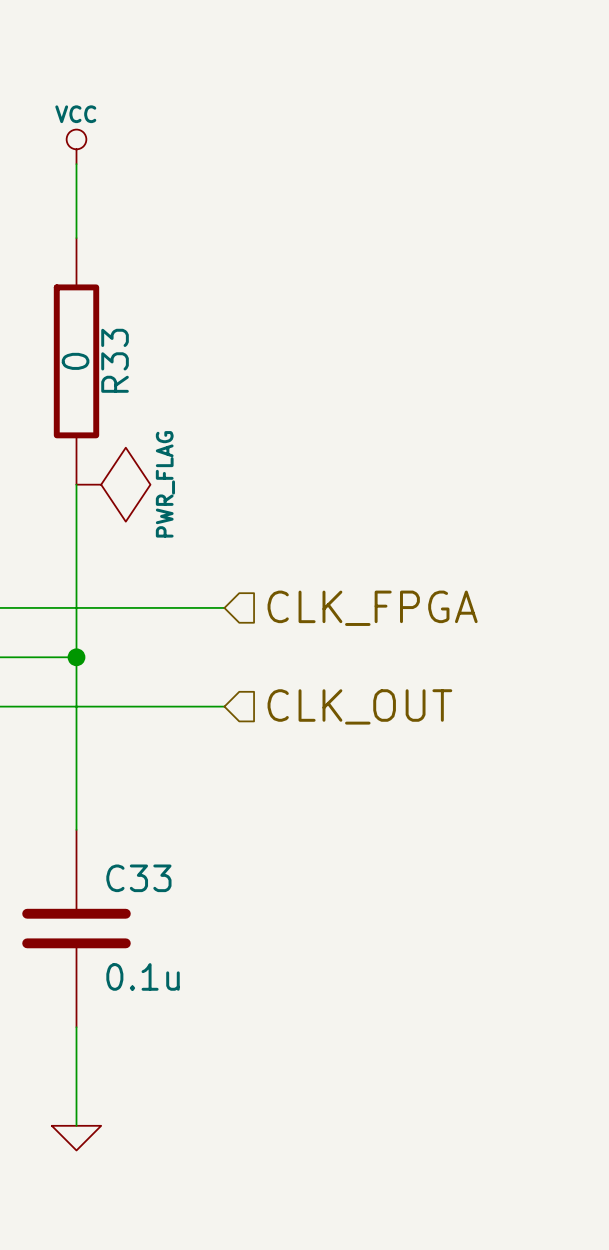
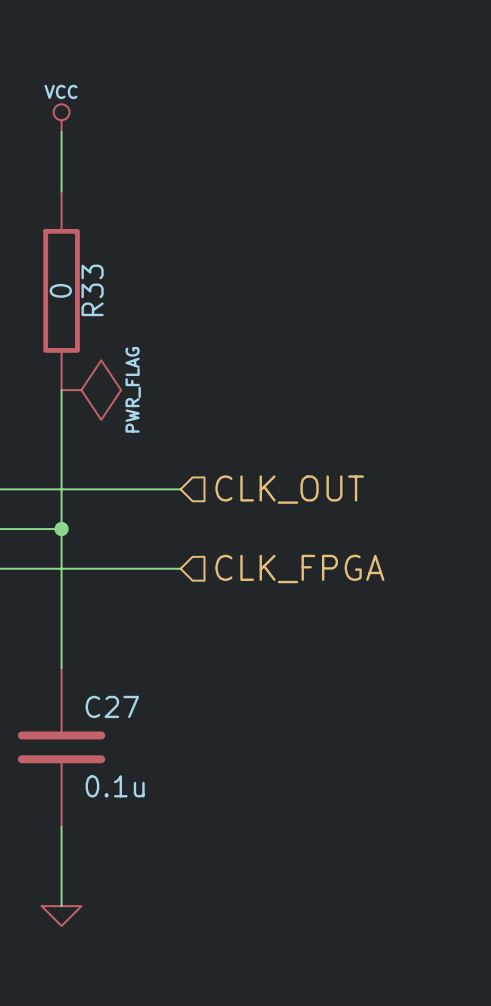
hierarchical label: CLK_FPGA (372, 608) -> CLK_OUT (289, 489)
hierarchical label: CLK_OUT (359, 706) -> CLK_FPGA (299, 568)
C33 name: C33 (138, 878) -> C27 (112, 706)

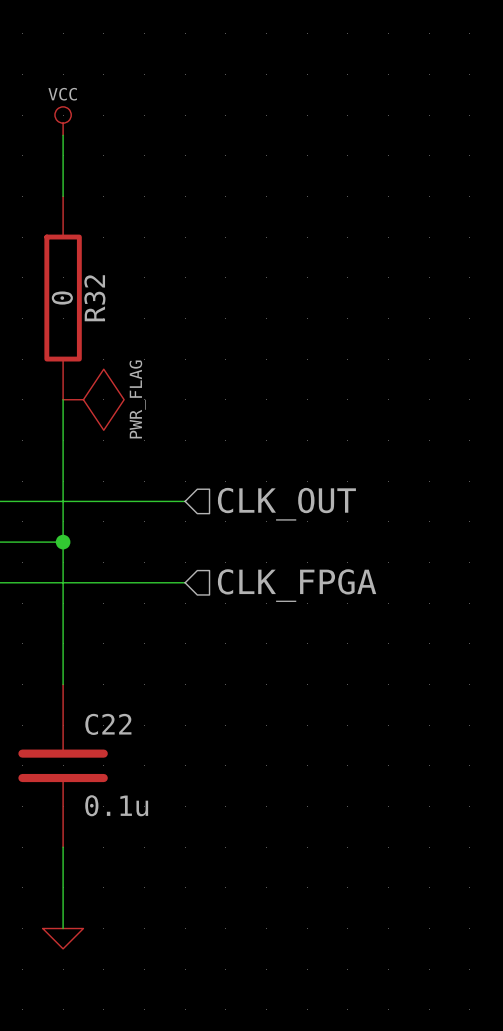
R33 name: R33 (92, 290) -> R32 (94, 298)
C27 name: C27 (112, 706) -> C22 (108, 724)

